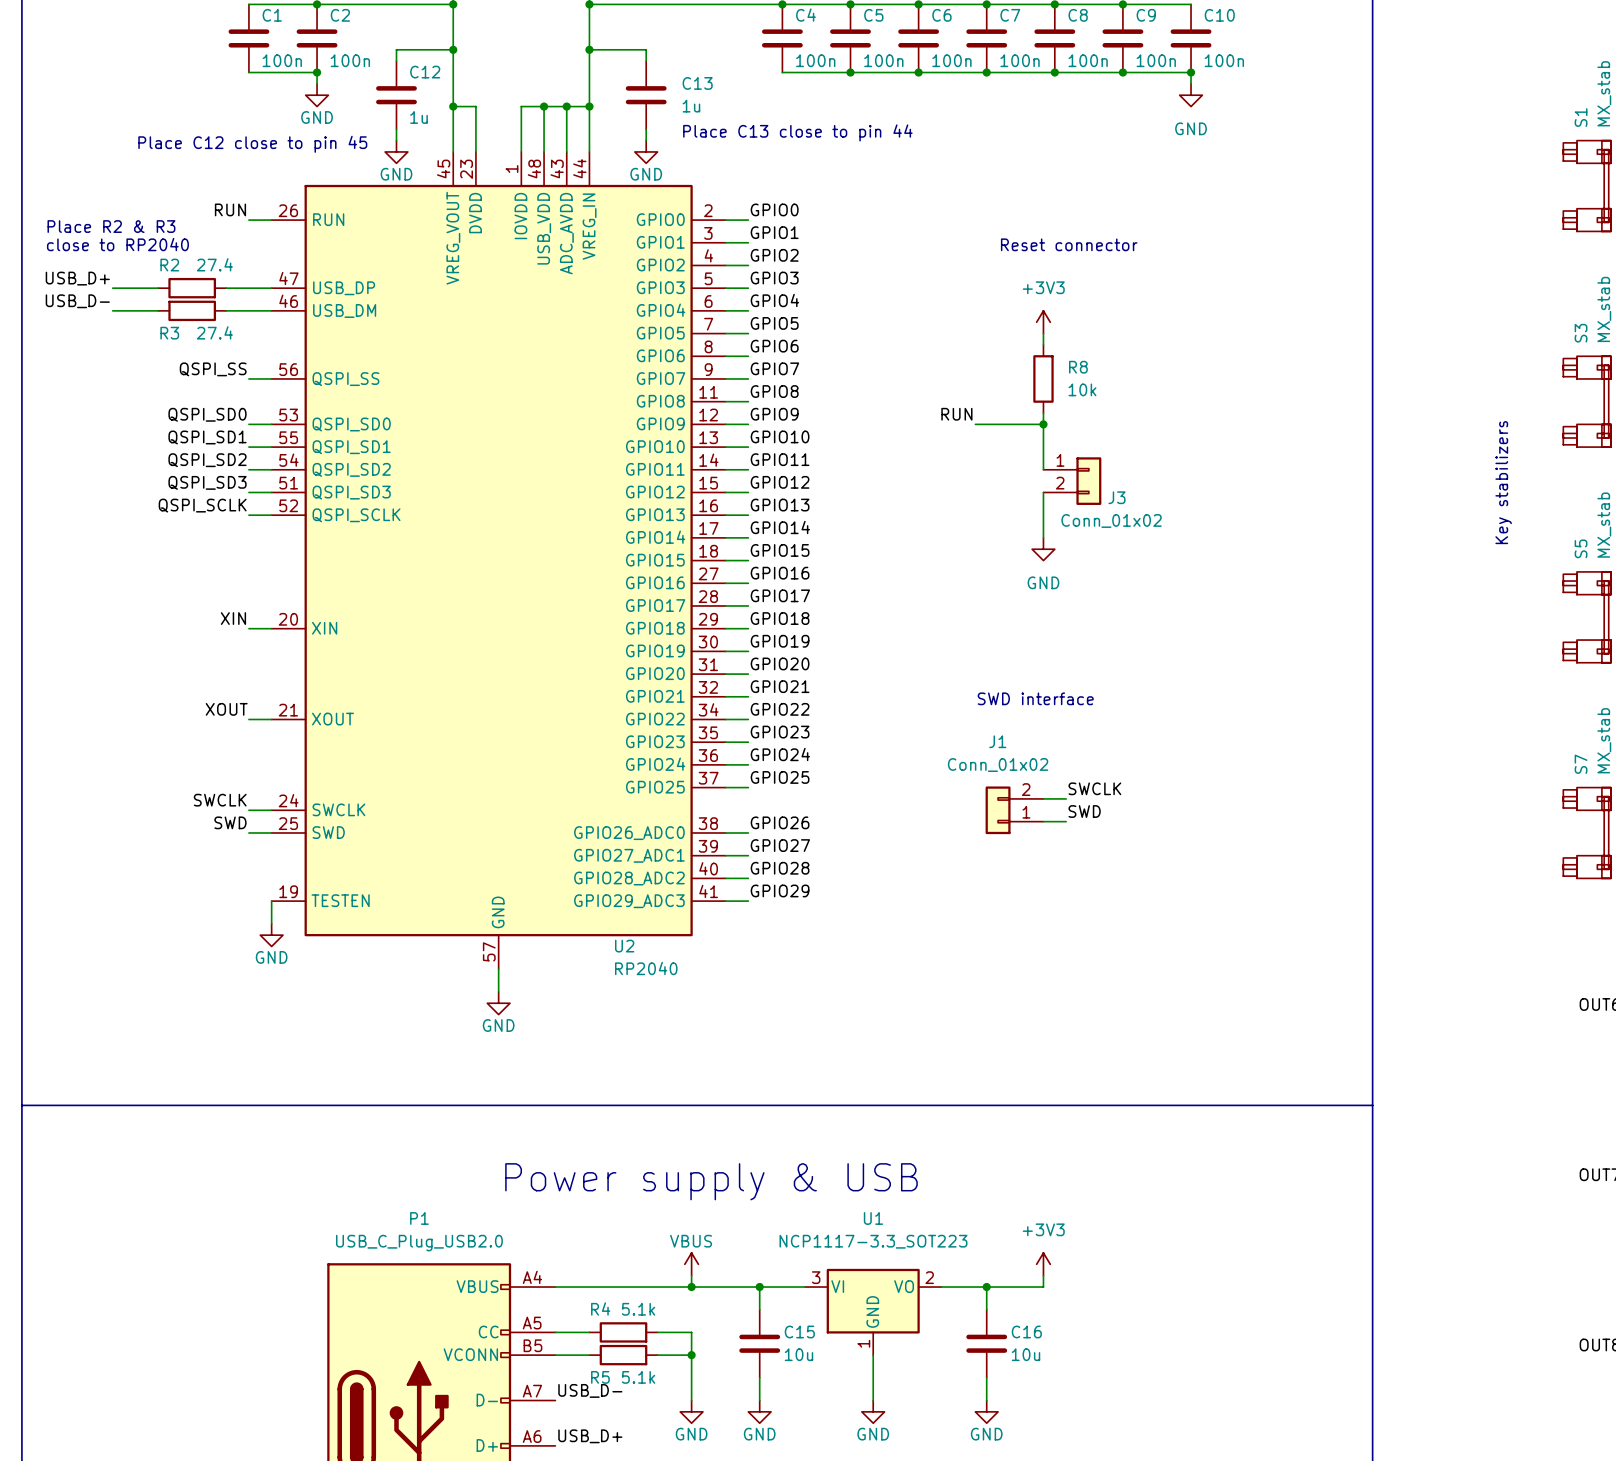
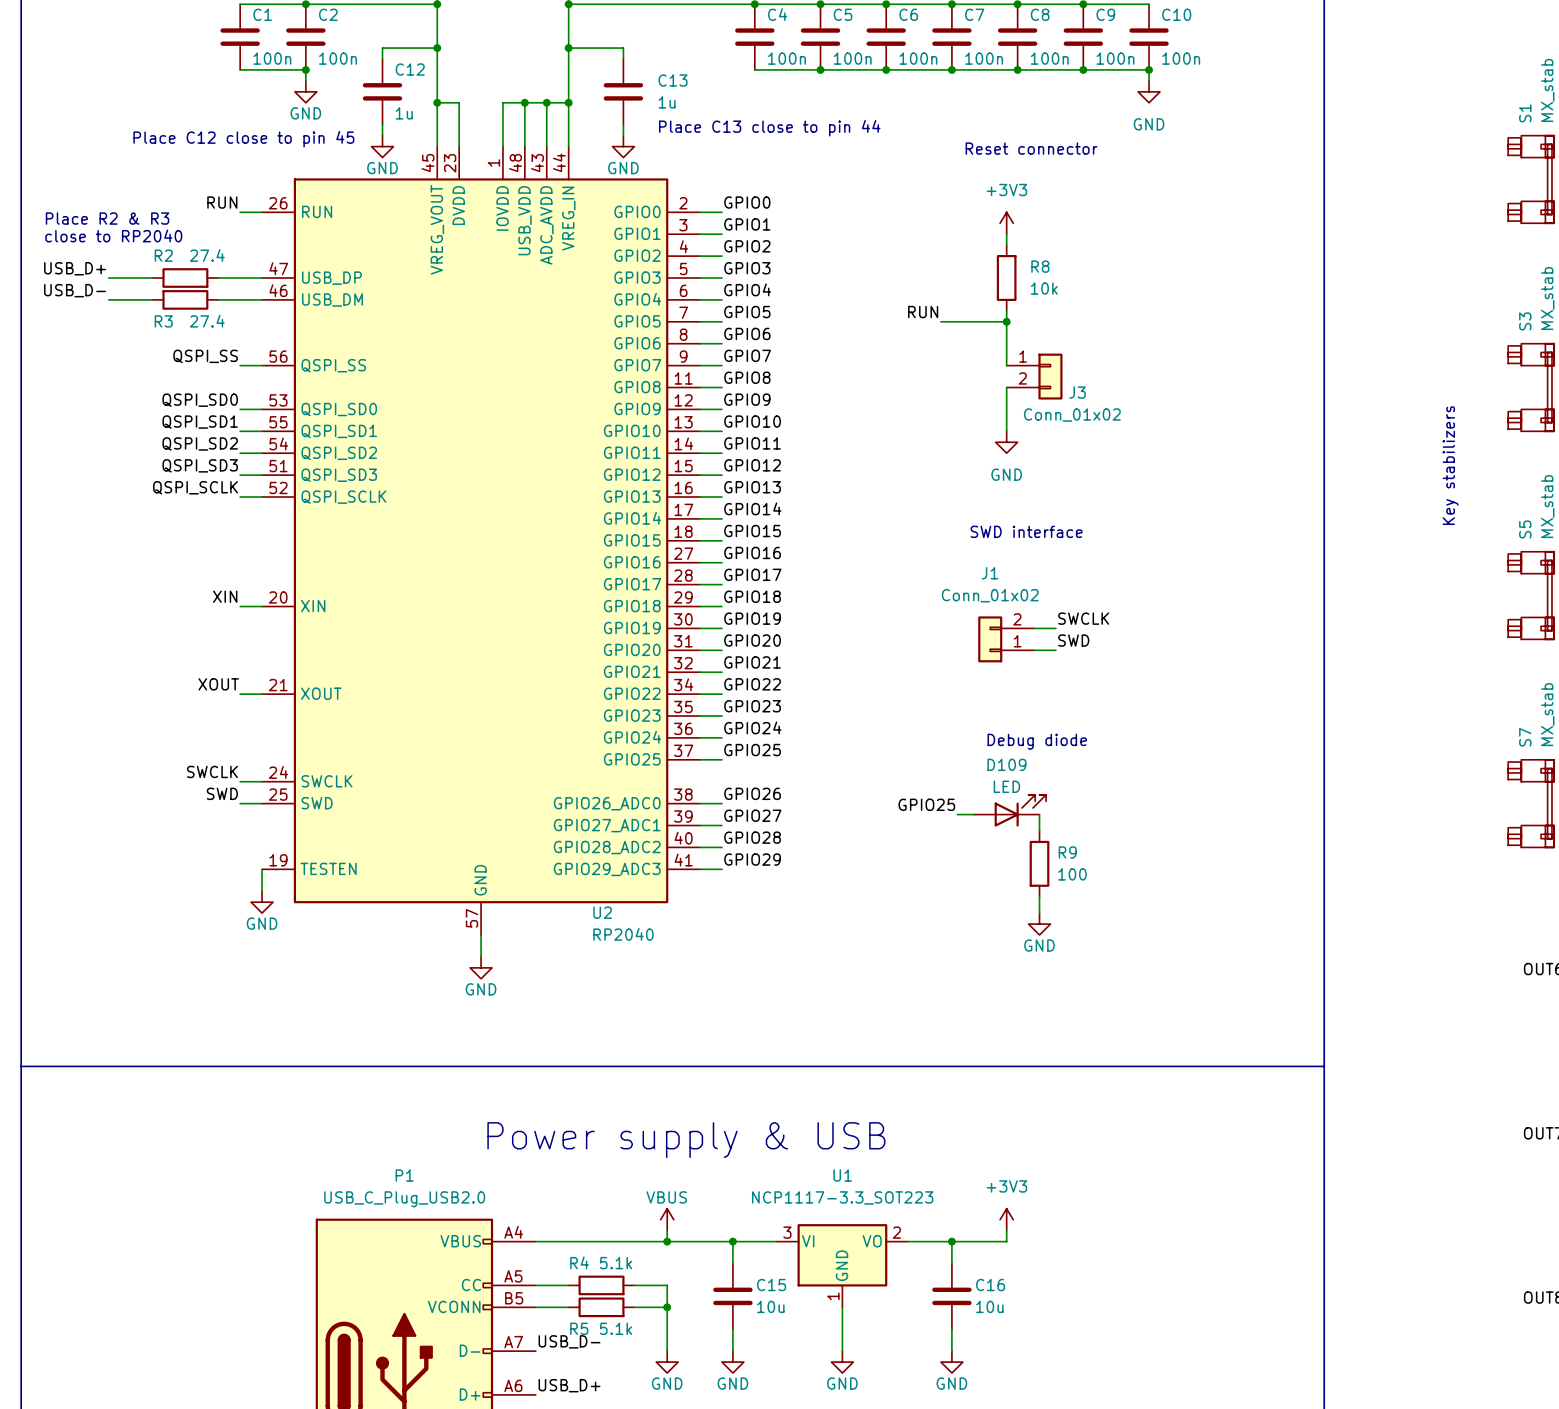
wire: none -> (1006, 234) (1006, 245)
text position: Reset connector (1069, 244) -> Reset connector (1031, 148)
wire: none -> (1006, 310) (1006, 321) (940, 321)
power symbol position: +3V3 (1043, 322) -> +3V3 (1006, 223)
junction: none -> (1006, 321)
wire: none -> (1006, 332) (1006, 365)
R8 position: (1043, 378) -> (1006, 278)
label position: RUN (956, 414) -> RUN (923, 312)
wire: (975, 424) (1043, 424) -> none
junction: (1043, 424) -> none
J3 position: (1072, 481) -> (1034, 376)
wire: (1043, 492) (1043, 537) -> none
power symbol position: GND (1043, 549) -> GND (1006, 442)
text position: SWD interface (1035, 698) -> SWD interface (1026, 531)
text: none -> Debug diode (1037, 741)
label position: SWCLK (1094, 788) -> SWCLK (1083, 618)
wire: (1043, 798) (1066, 798) -> (1034, 628) (1055, 628)
J1 position: (1014, 810) -> (1006, 639)
label position: SWD (1084, 811) -> SWD (1073, 640)
wire: (1043, 821) (1066, 821) -> (1034, 650) (1055, 650)
label: none -> GPIO25 (926, 804)
D109: none -> LED (1009, 810)
wire: none -> (957, 814) (973, 814)
wire: none -> (1039, 814) (1039, 830)
R9: none -> 100 (1039, 863)
wire: none -> (1039, 896) (1039, 913)
power symbol: none -> GND (1039, 924)

